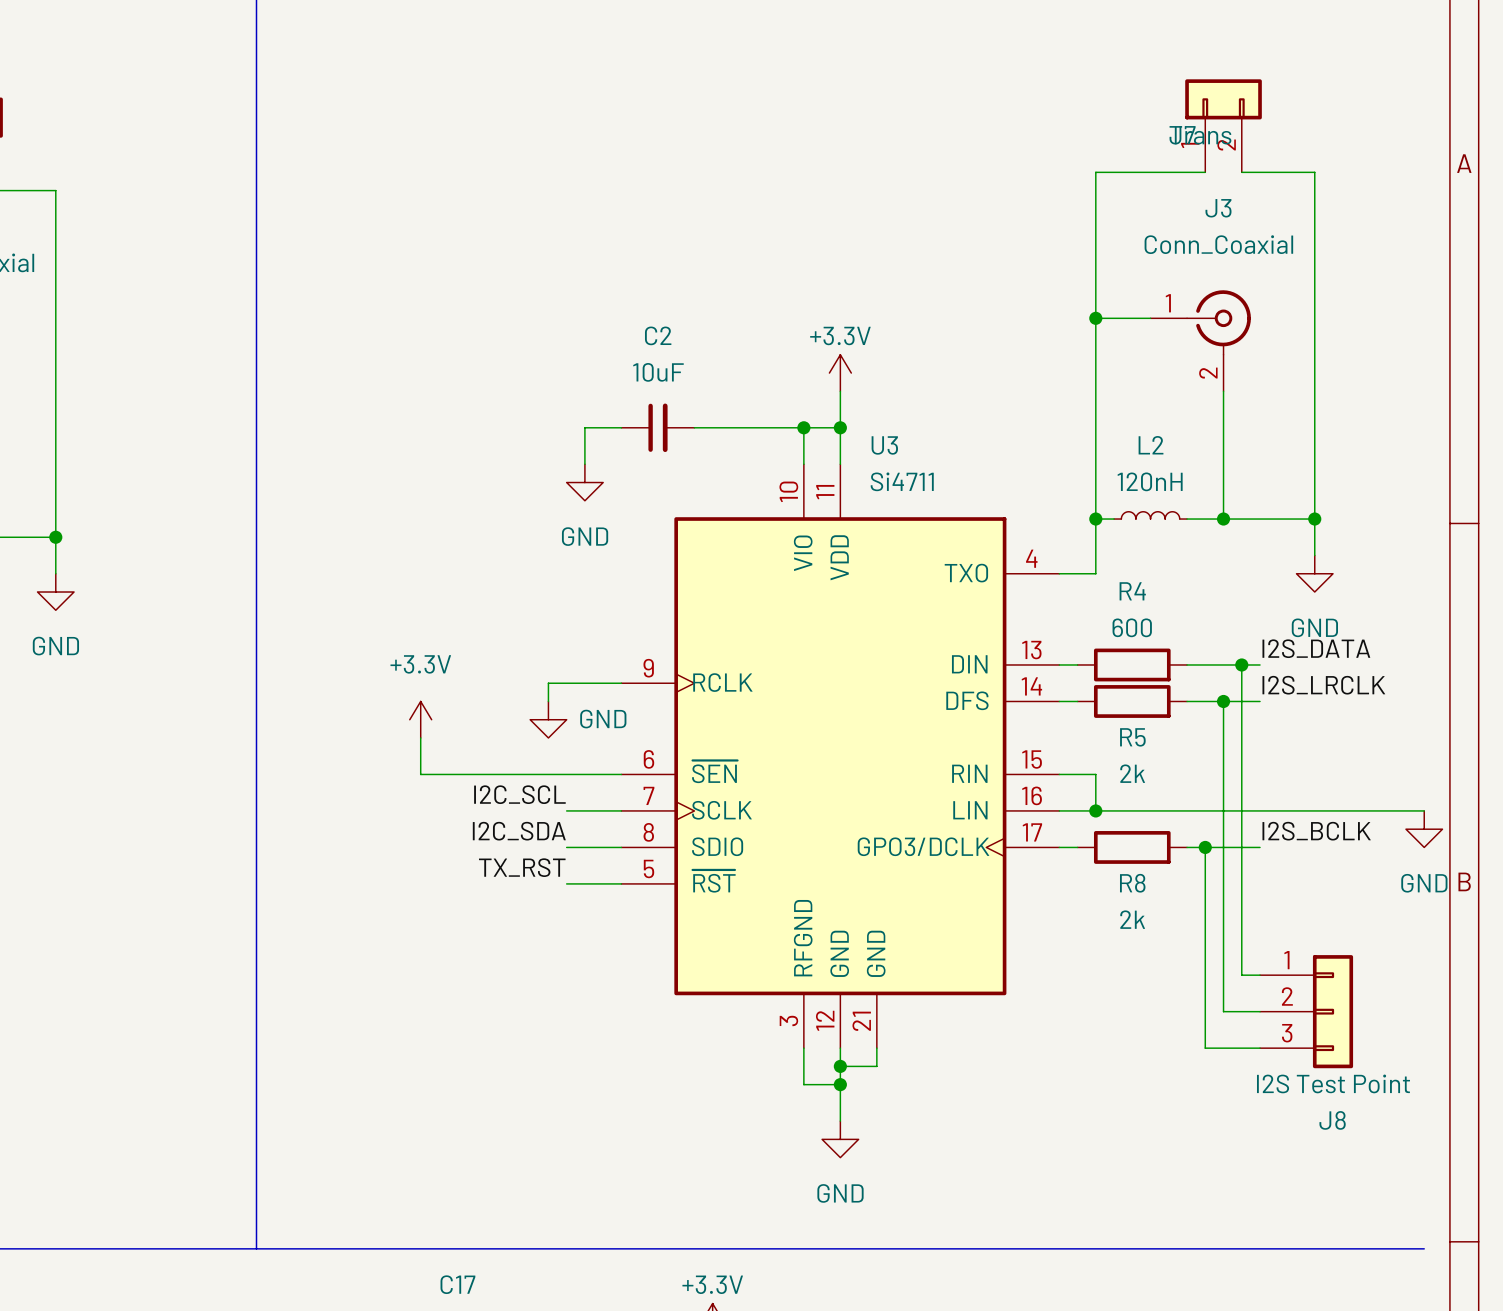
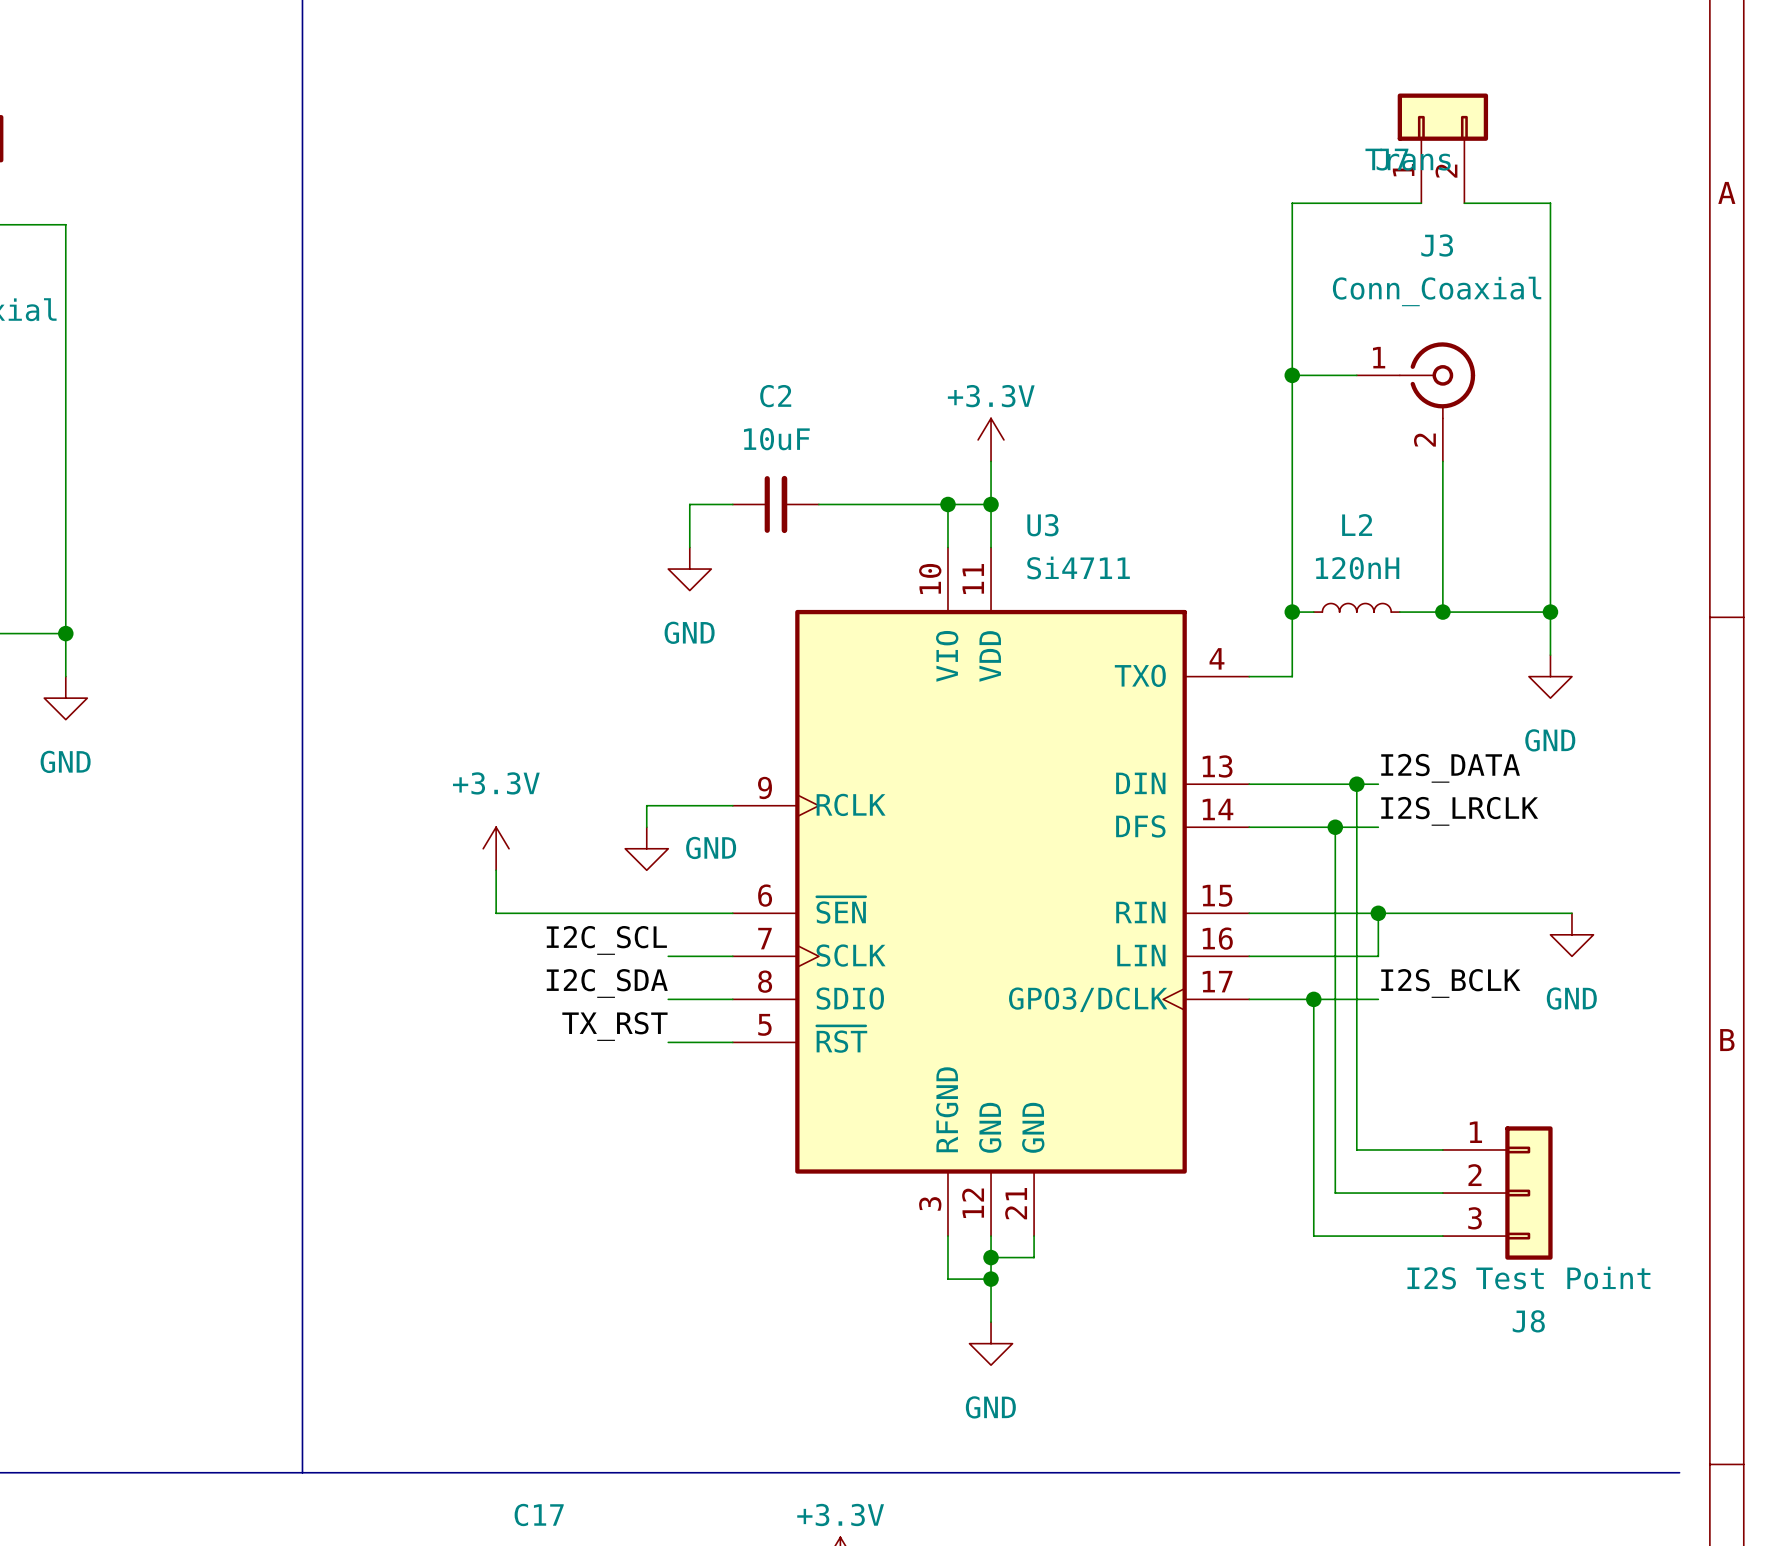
label position: I2S_DATA (1316, 648) -> I2S_DATA (1450, 768)
wire: none -> (1270, 784) (1378, 784)
R4: 600 (1132, 664) -> none
wire: none -> (1356, 784) (1356, 1149) (1442, 1149)
junction: none -> (1356, 784)
wire: (1187, 664) (1260, 664) -> none
wire: (1241, 664) (1241, 975) (1260, 975) -> none
junction: (1241, 664) -> none
label position: I2S_LRCLK (1323, 685) -> I2S_LRCLK (1459, 811)
wire: none -> (1270, 827) (1378, 827)
wire: none -> (1335, 827) (1335, 1193) (1442, 1193)
junction: none -> (1335, 827)
R5: 2k (1132, 701) -> none
wire: (1187, 701) (1260, 701) -> none
wire: (1223, 701) (1223, 1011) (1260, 1011) -> none
junction: (1223, 701) -> none
wire: (1095, 774) (1095, 810) -> (1292, 913) (1571, 913)
junction: none -> (1378, 913)
junction: (1095, 810) -> none
wire: (1168, 810) (1424, 810) -> (1378, 956) (1378, 913)
power symbol position: GND (1424, 829) -> GND (1571, 934)
label position: I2S_BCLK (1316, 831) -> I2S_BCLK (1450, 983)
wire: none -> (1270, 999) (1378, 999)
junction: none -> (1313, 999)
R8: 2k (1132, 847) -> none
wire: (1187, 847) (1260, 847) -> none
wire: (1205, 847) (1205, 1048) -> (1313, 999) (1313, 1236) (1421, 1236)
junction: (1205, 847) -> none
J8 position: (1306, 1011) -> (1497, 1193)

